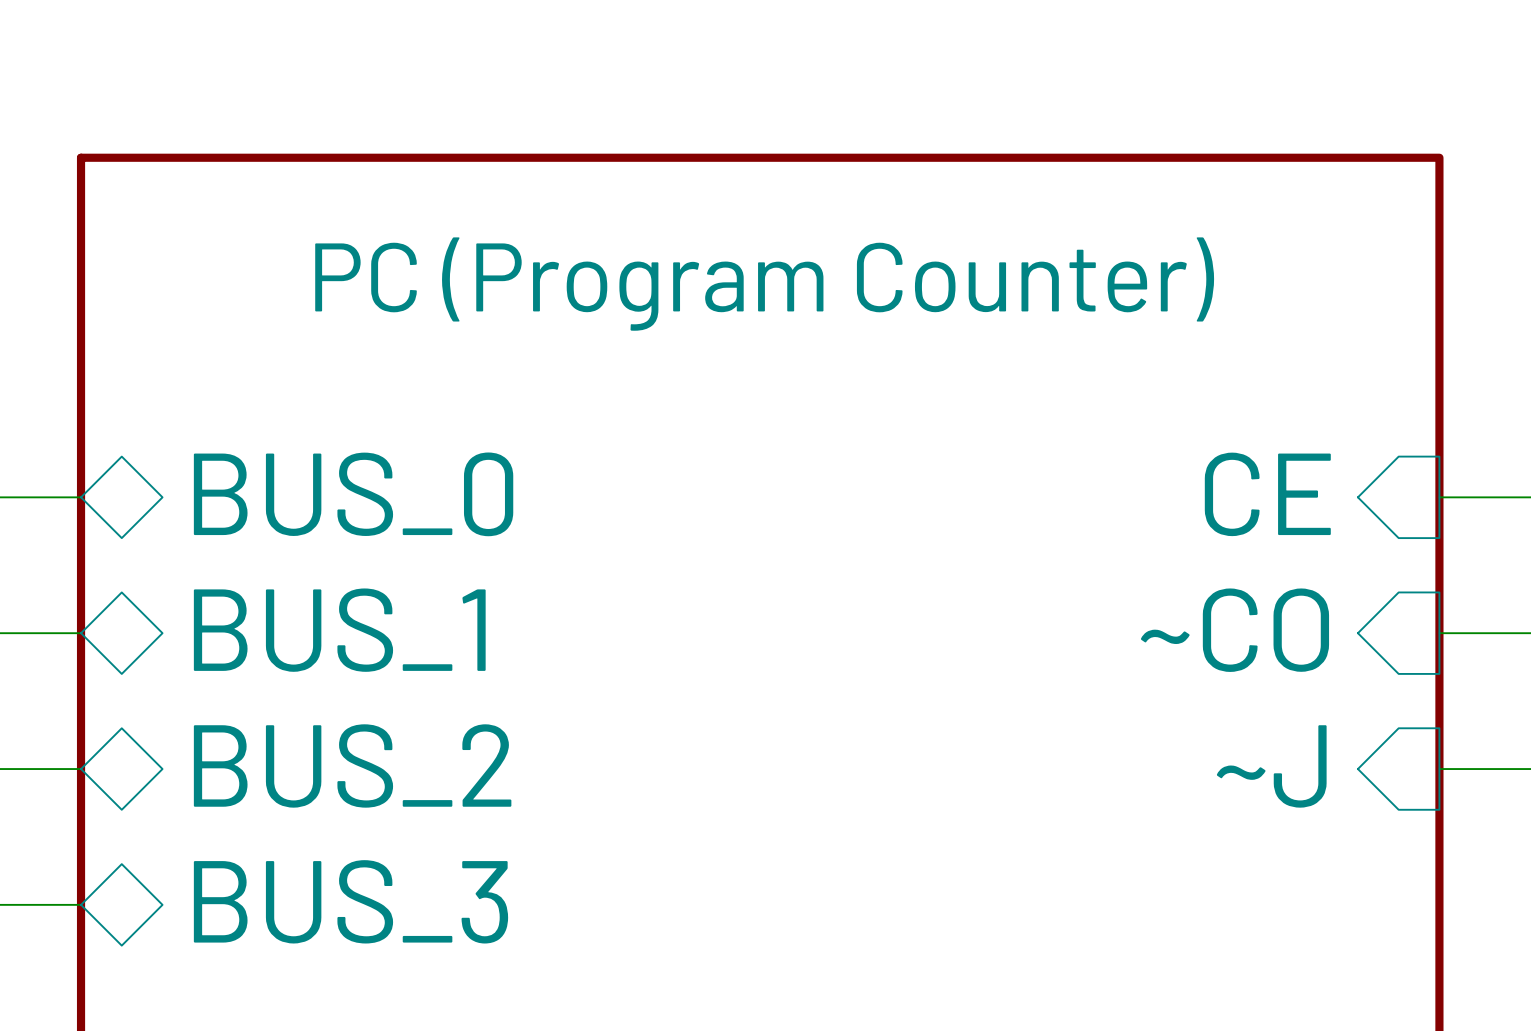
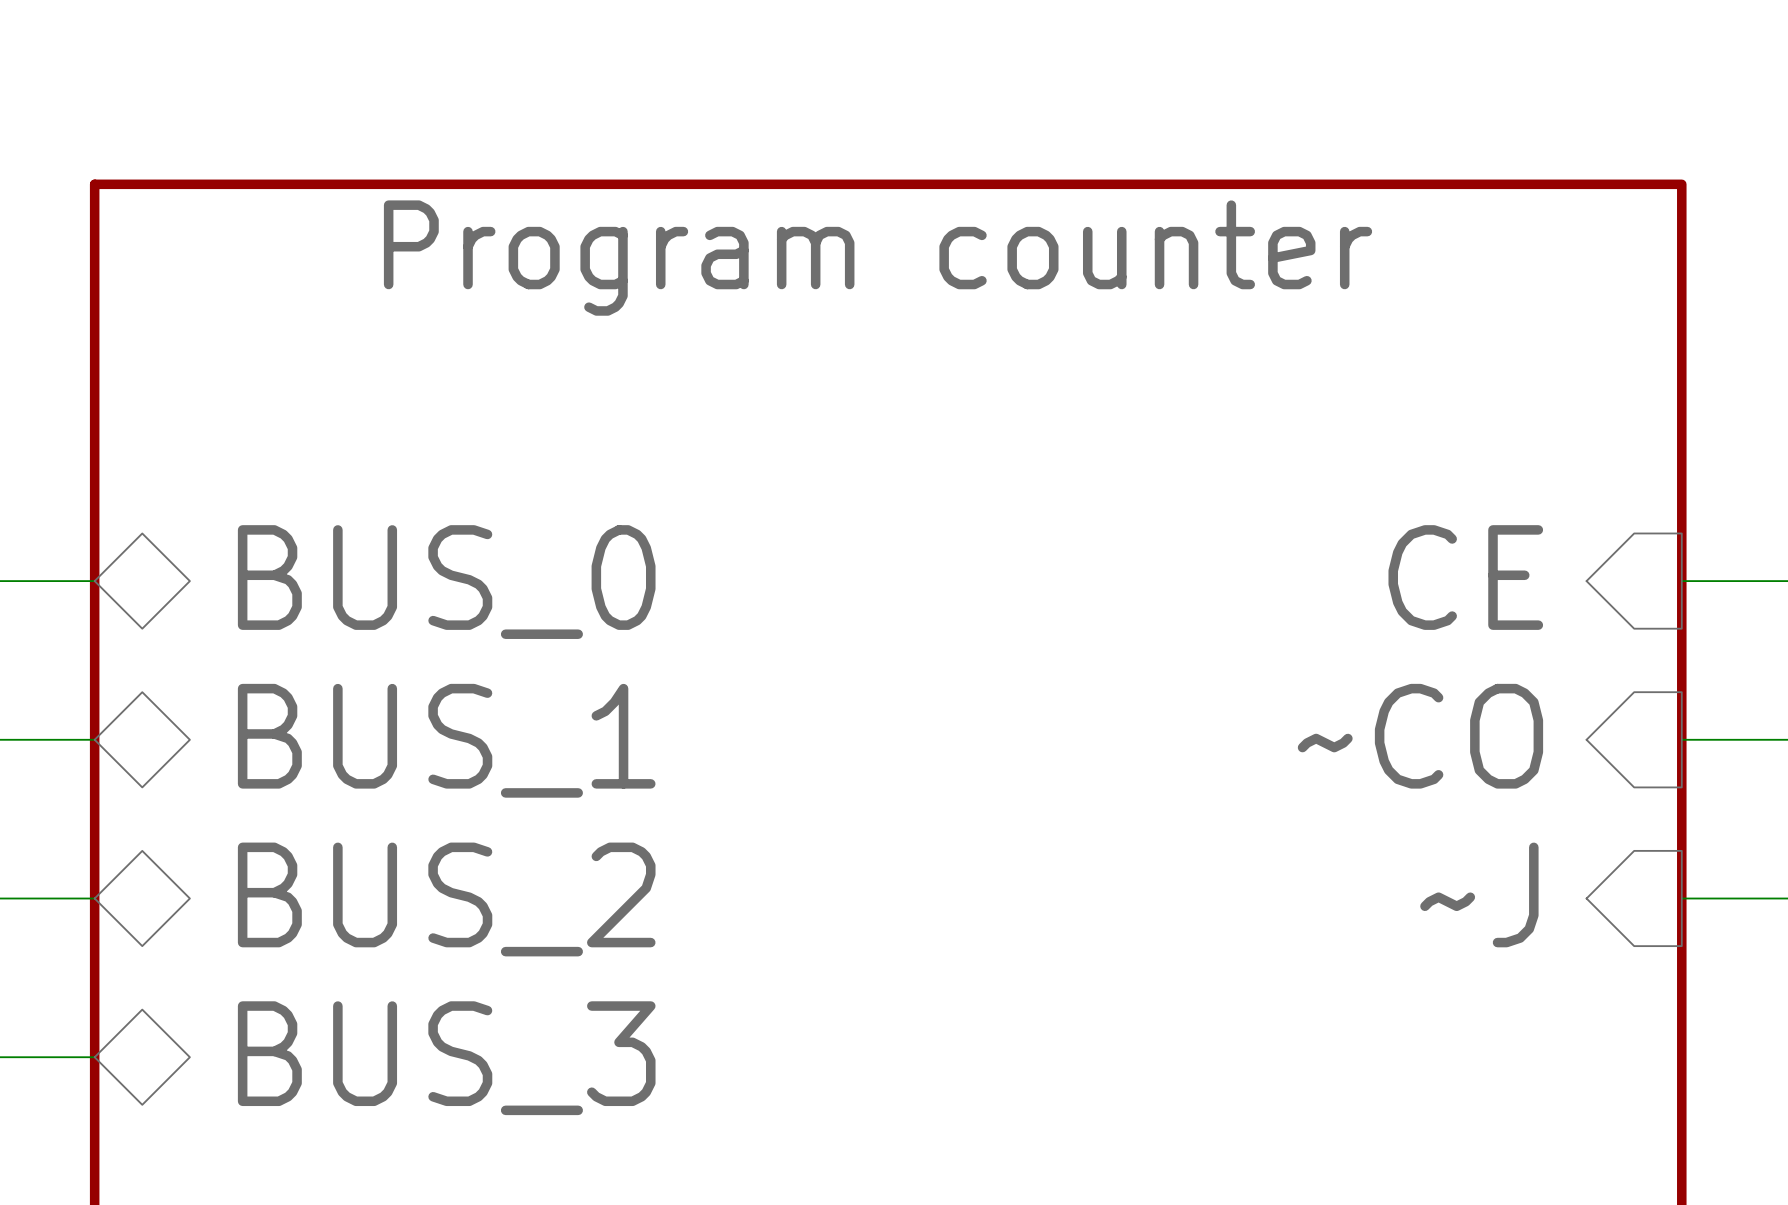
sheet PC (Program Counter) name: PC (Program Counter) (764, 284) -> Program counter (878, 258)

